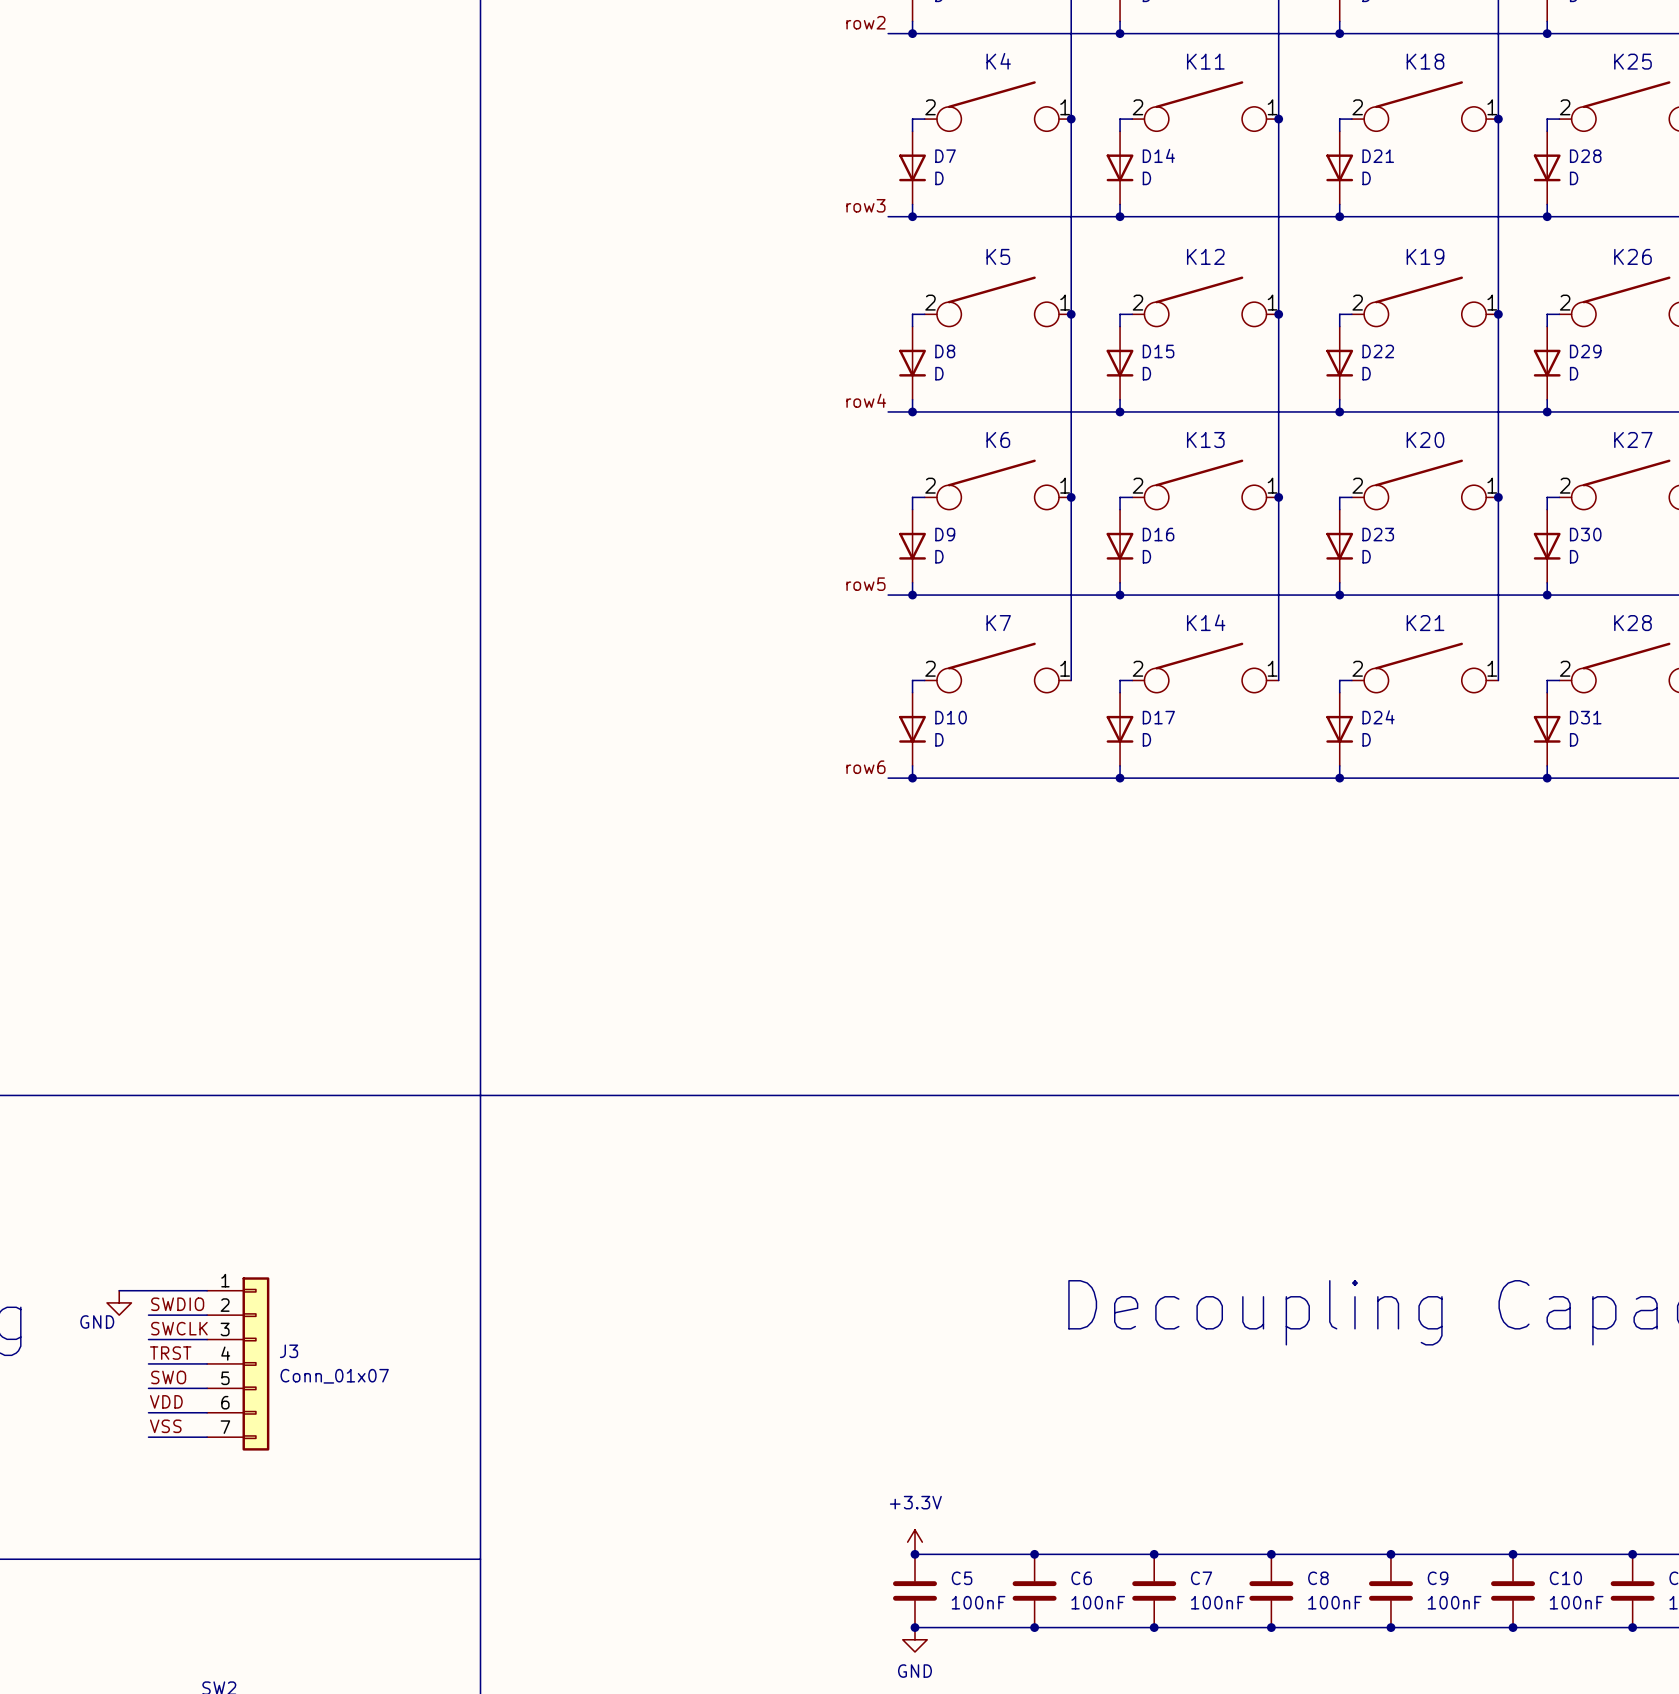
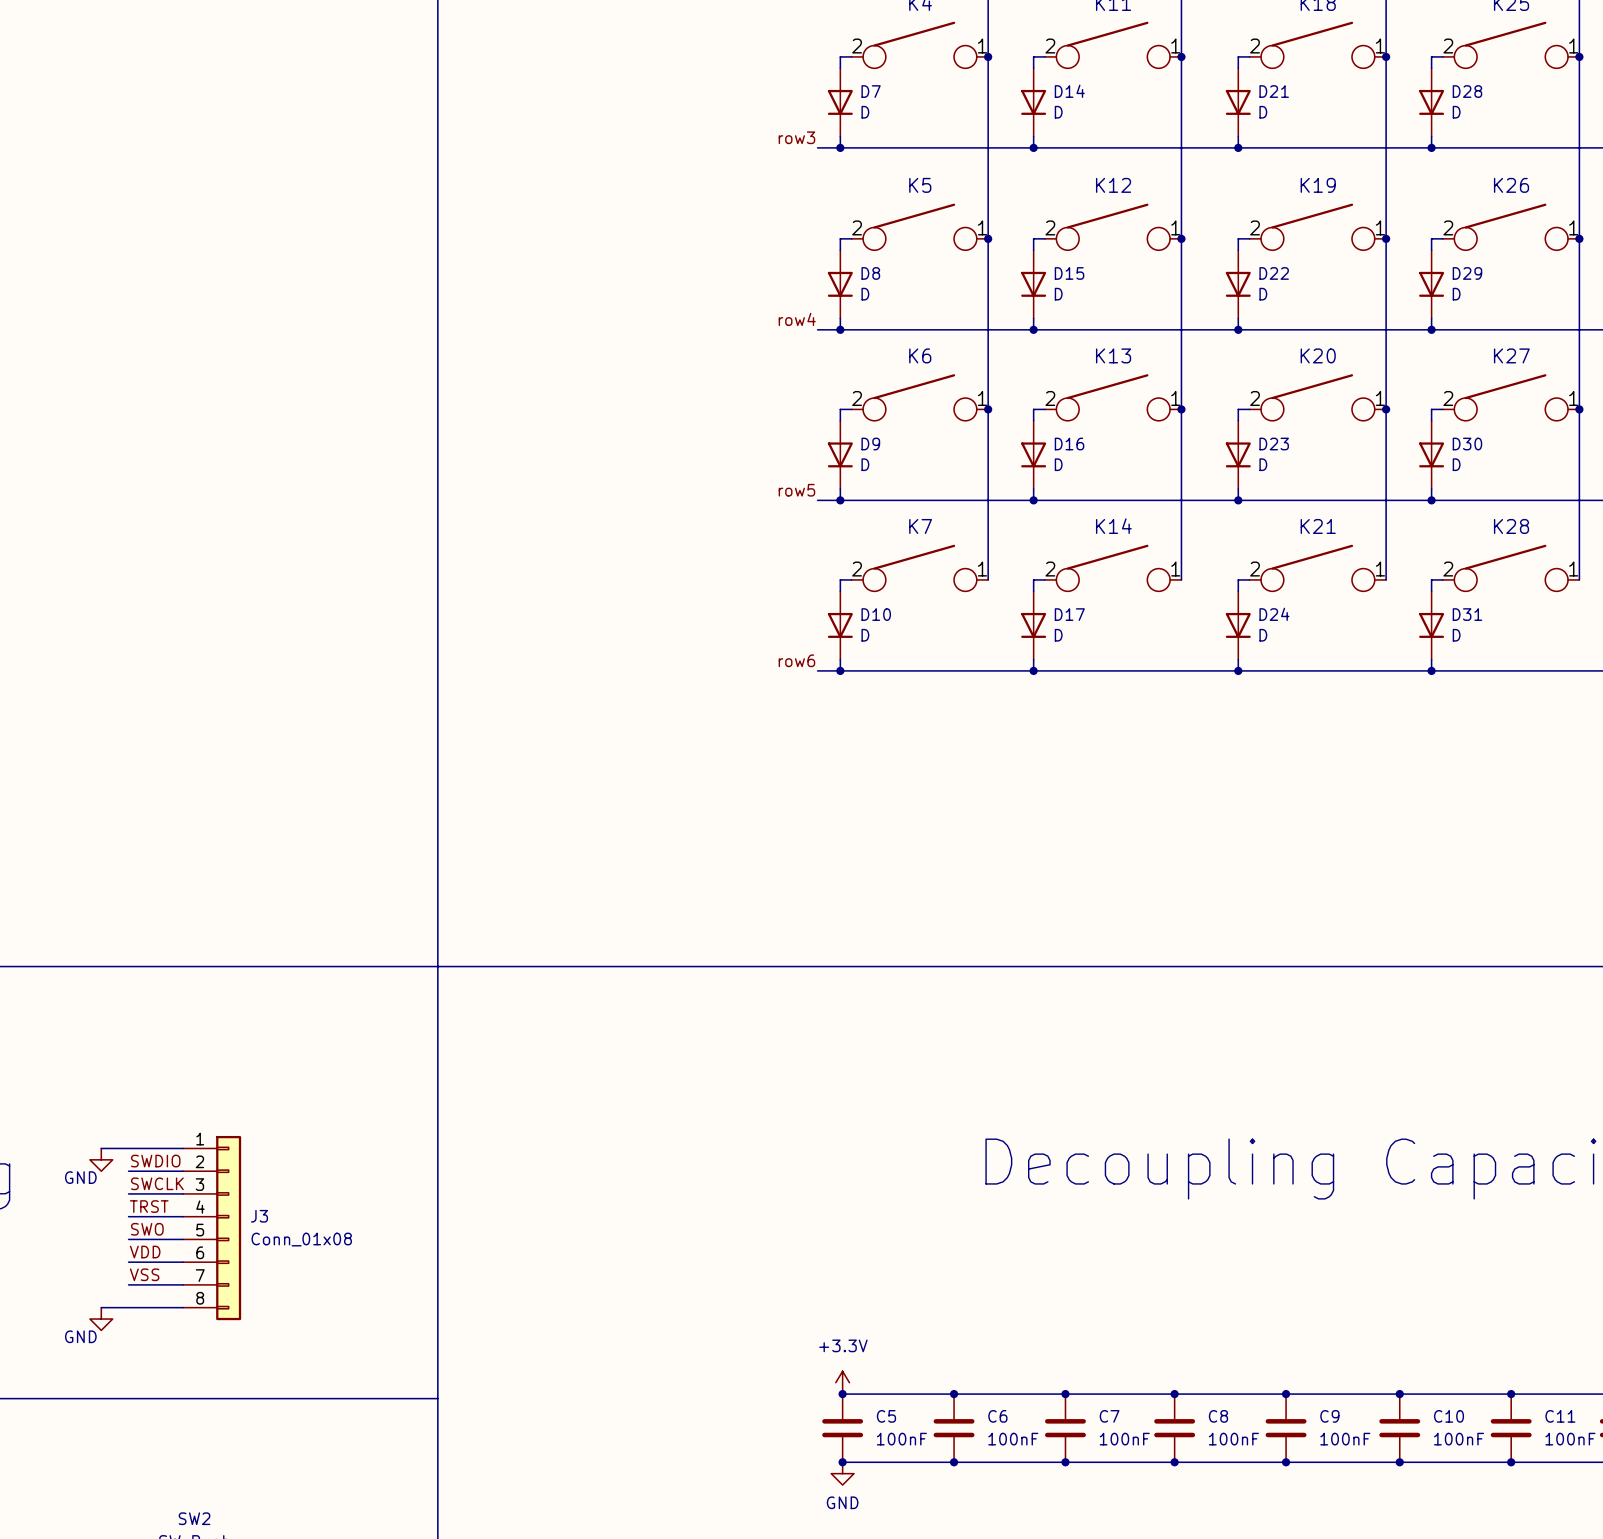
J3 symbol: [207, 1277, 270, 1451] -> [183, 1135, 242, 1321]
J3 value: Conn_01x07 (334, 1376) -> Conn_01x08 (301, 1239)
wire: none -> (101, 1307) (183, 1307)
power symbol: none -> GND (101, 1319)

